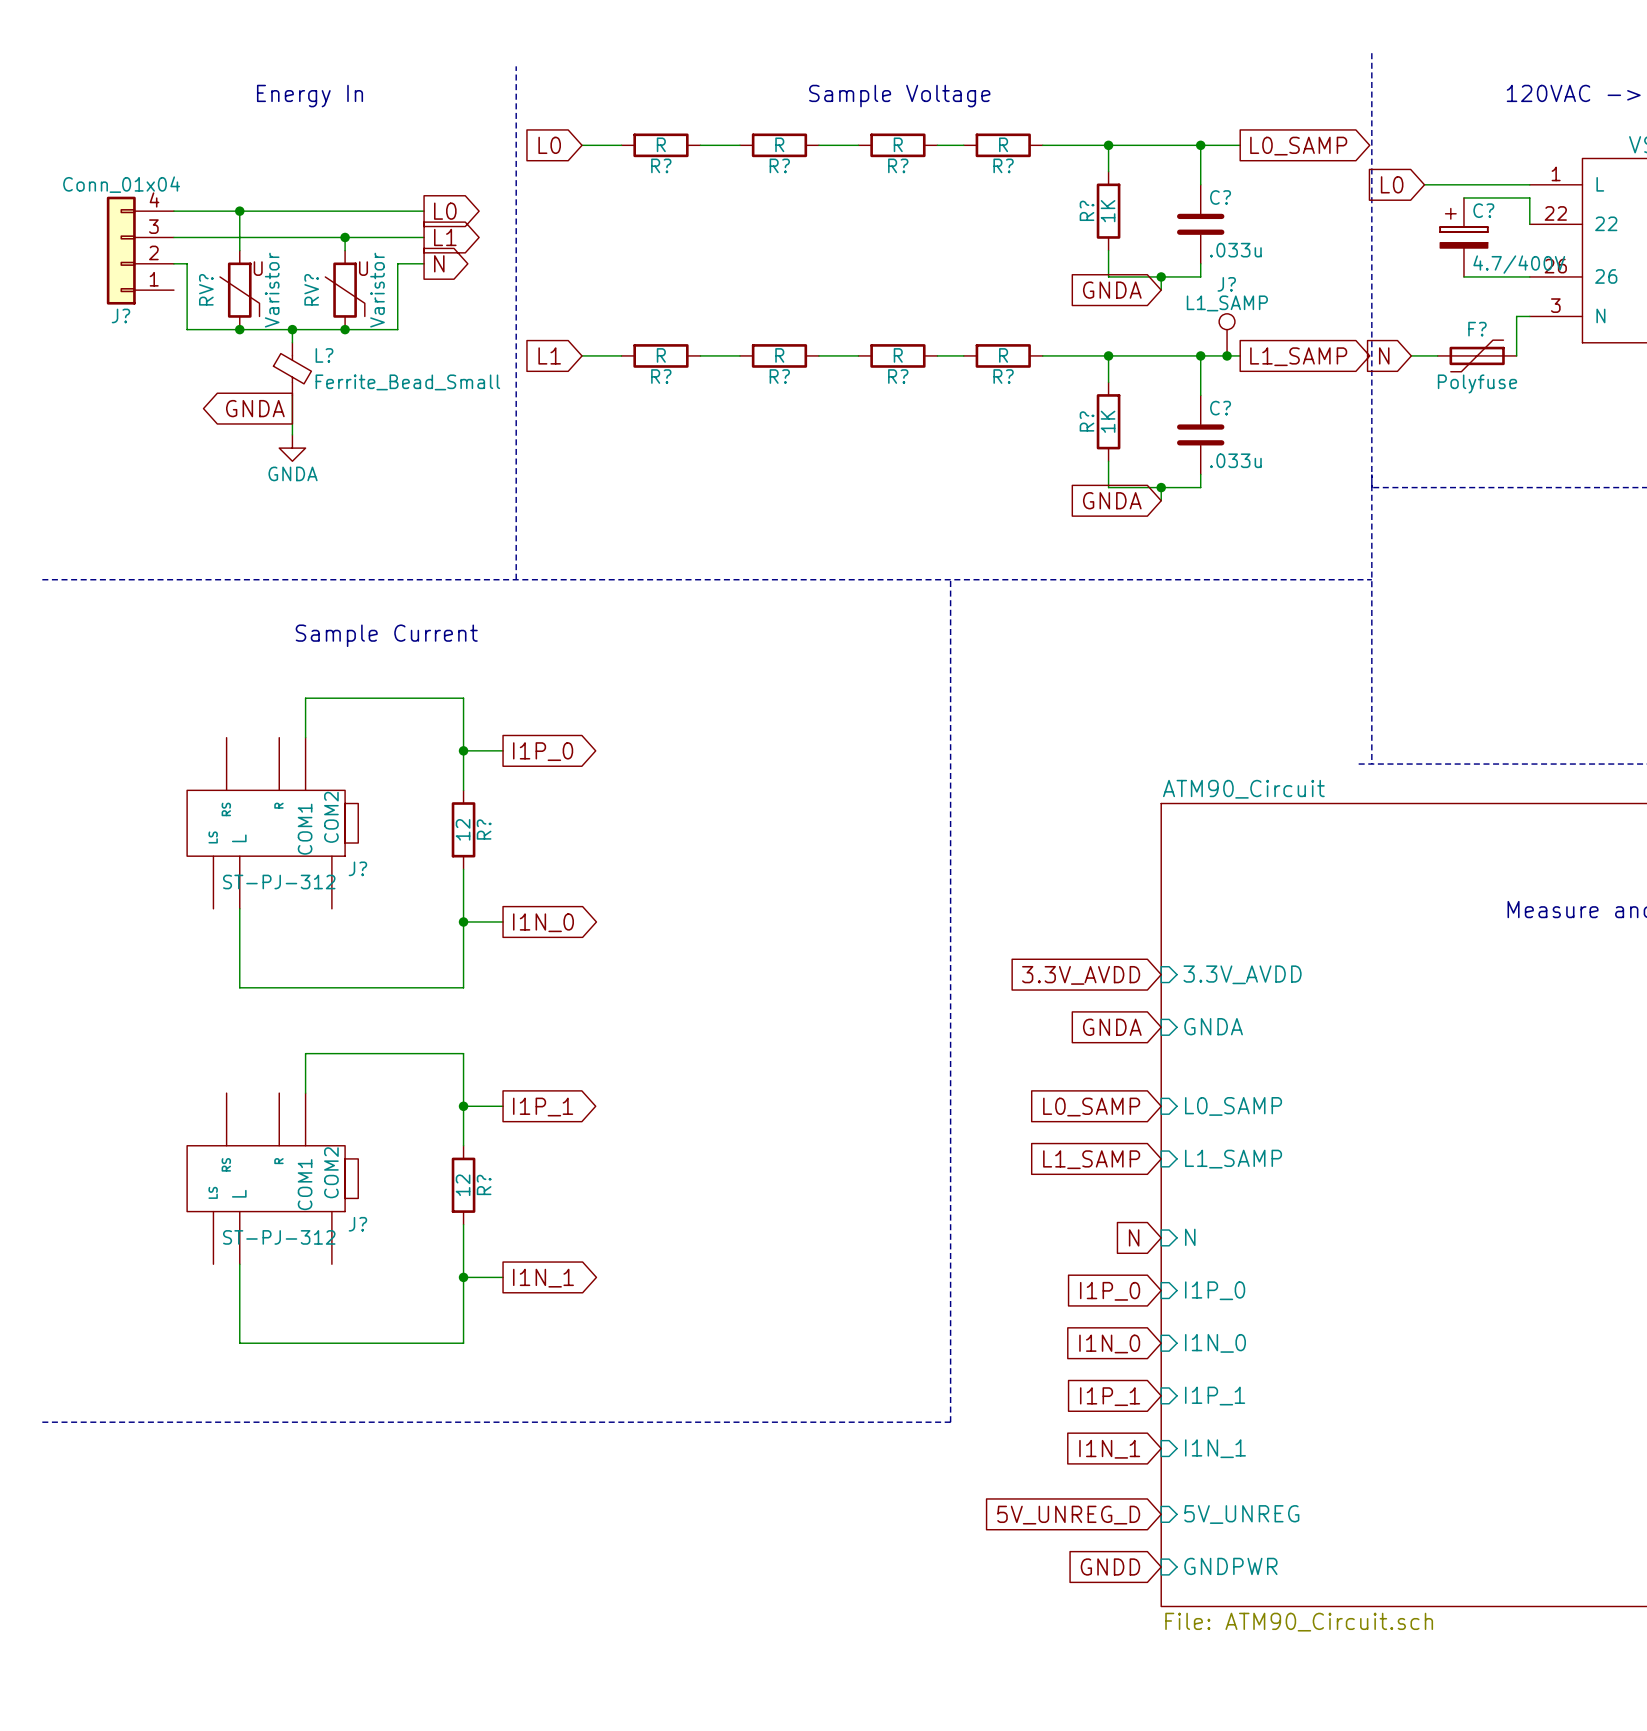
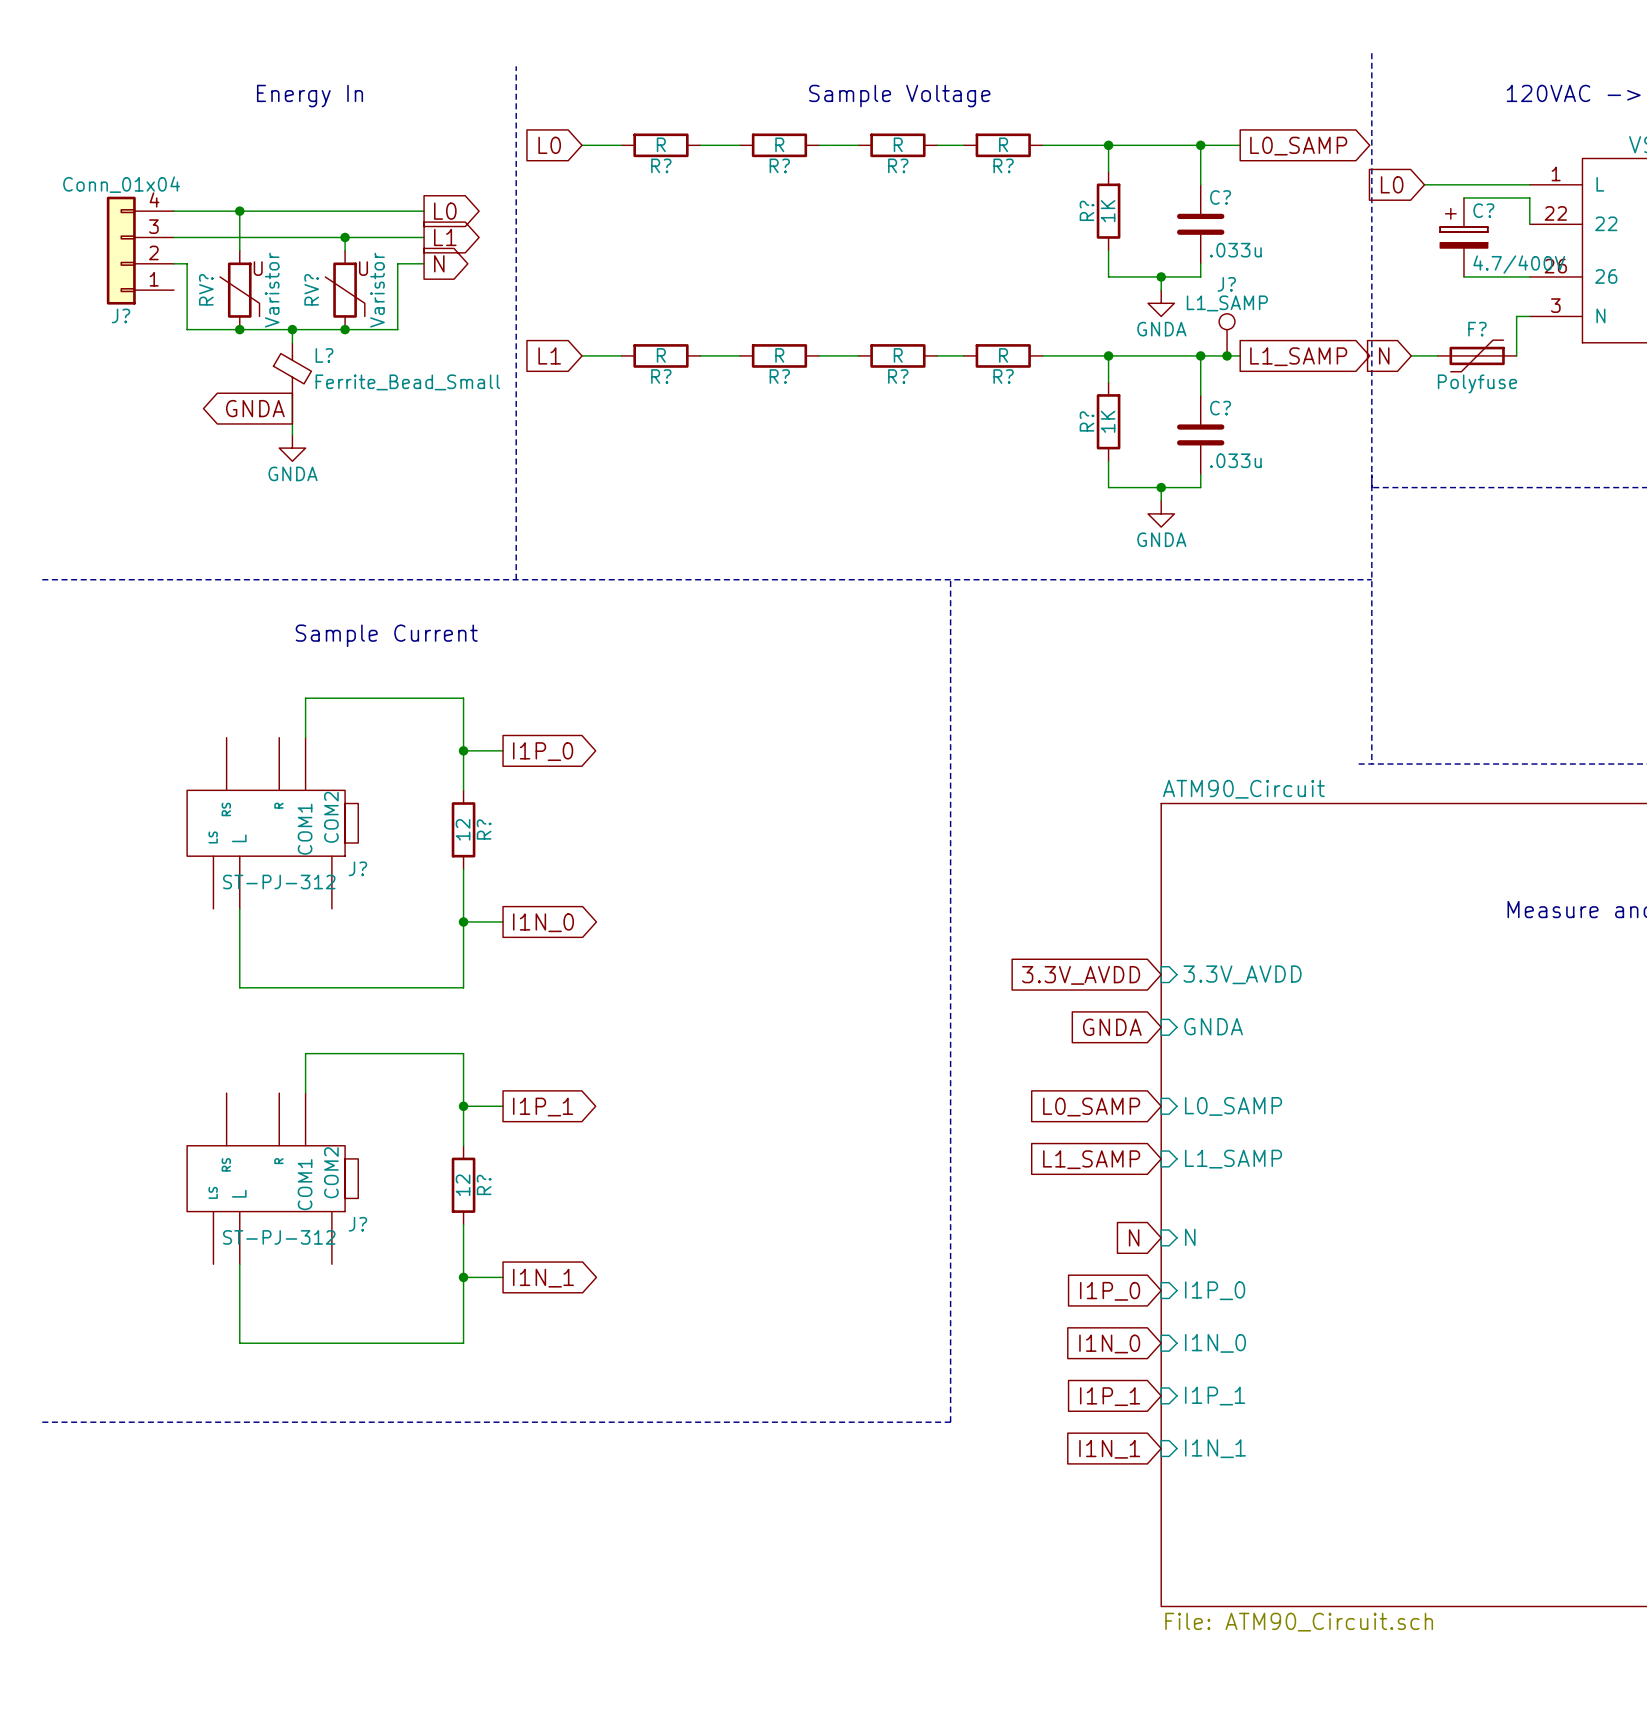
global label: GNDA (1112, 290) -> none
power symbol: none -> GNDA (1161, 303)
global label: GNDA (1112, 500) -> none
power symbol: none -> GNDA (1161, 513)
sheet pin: 5V_UNREG (1241, 1514) -> none
global label: 5V_UNREG_D (1068, 1515) -> none
sheet pin: GNDPWR (1230, 1566) -> none
global label: GNDD (1110, 1567) -> none

